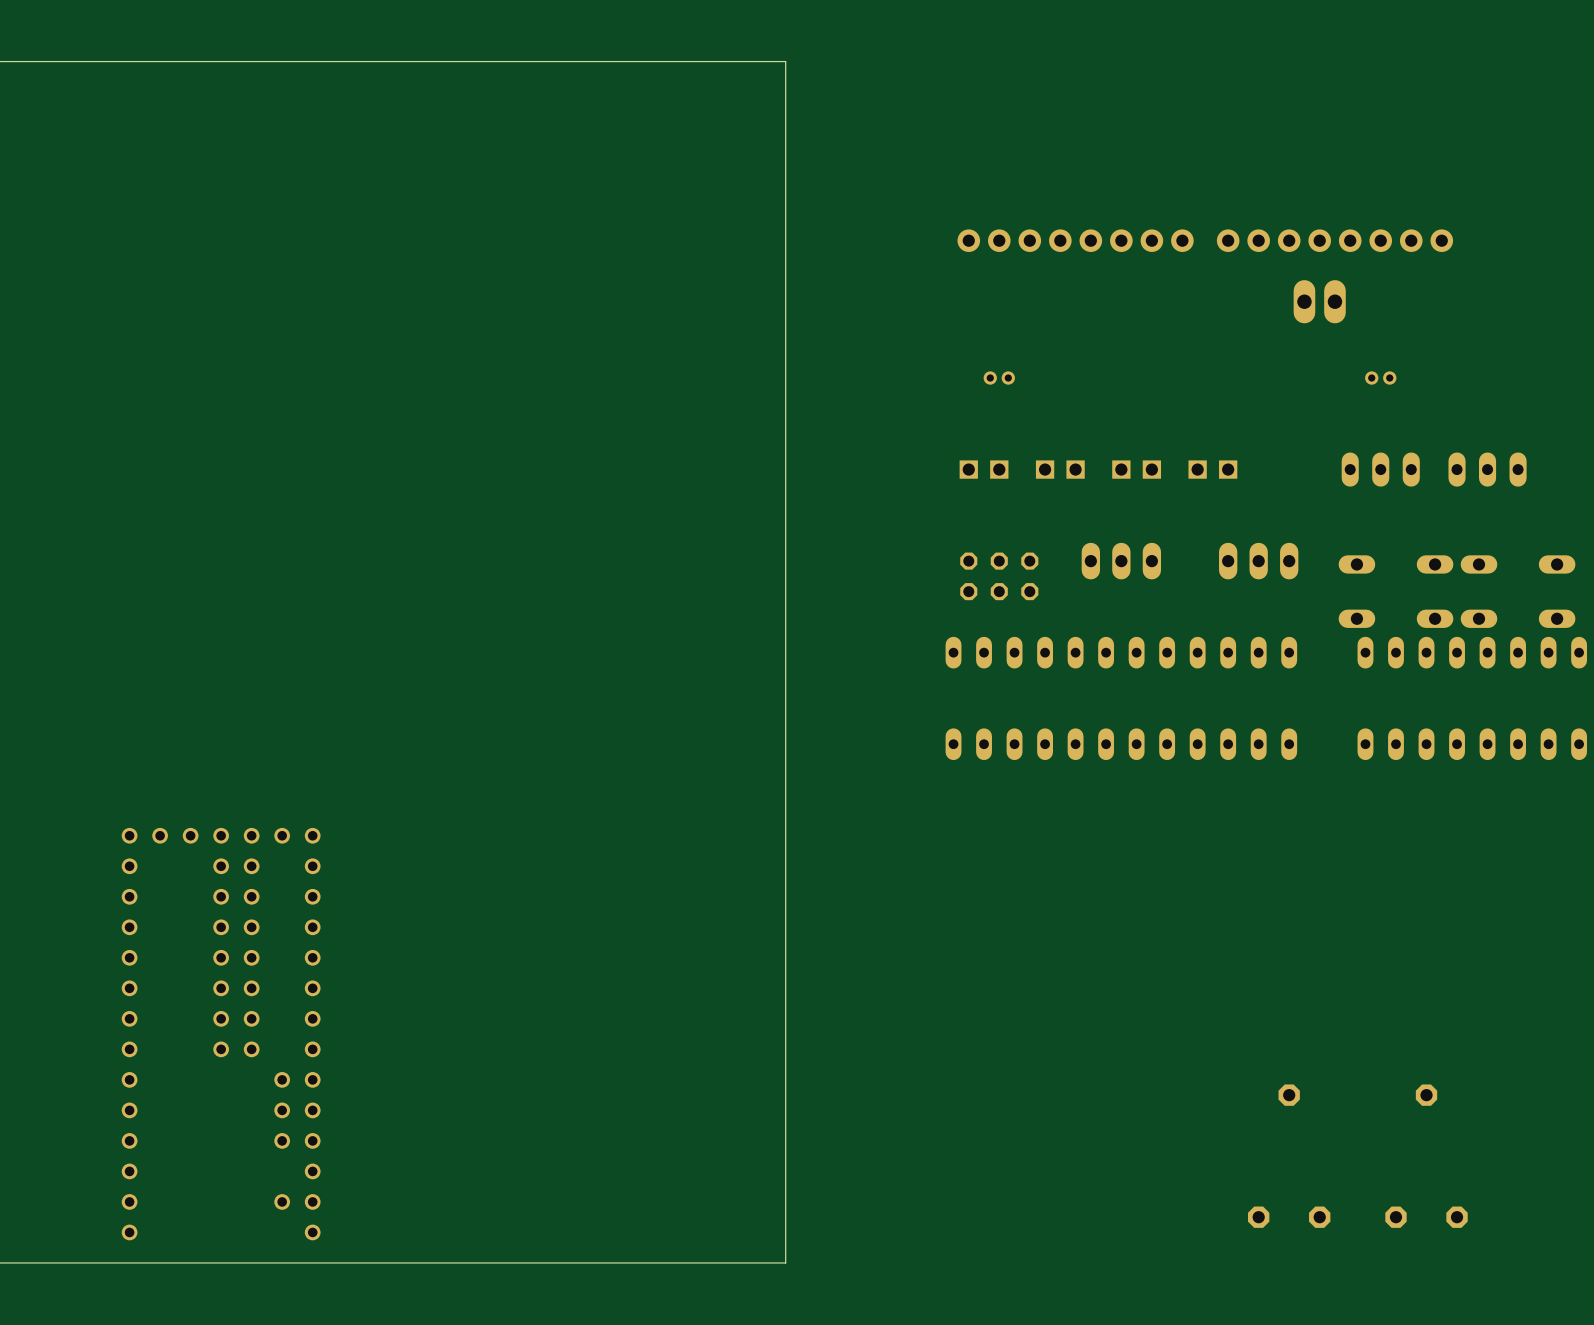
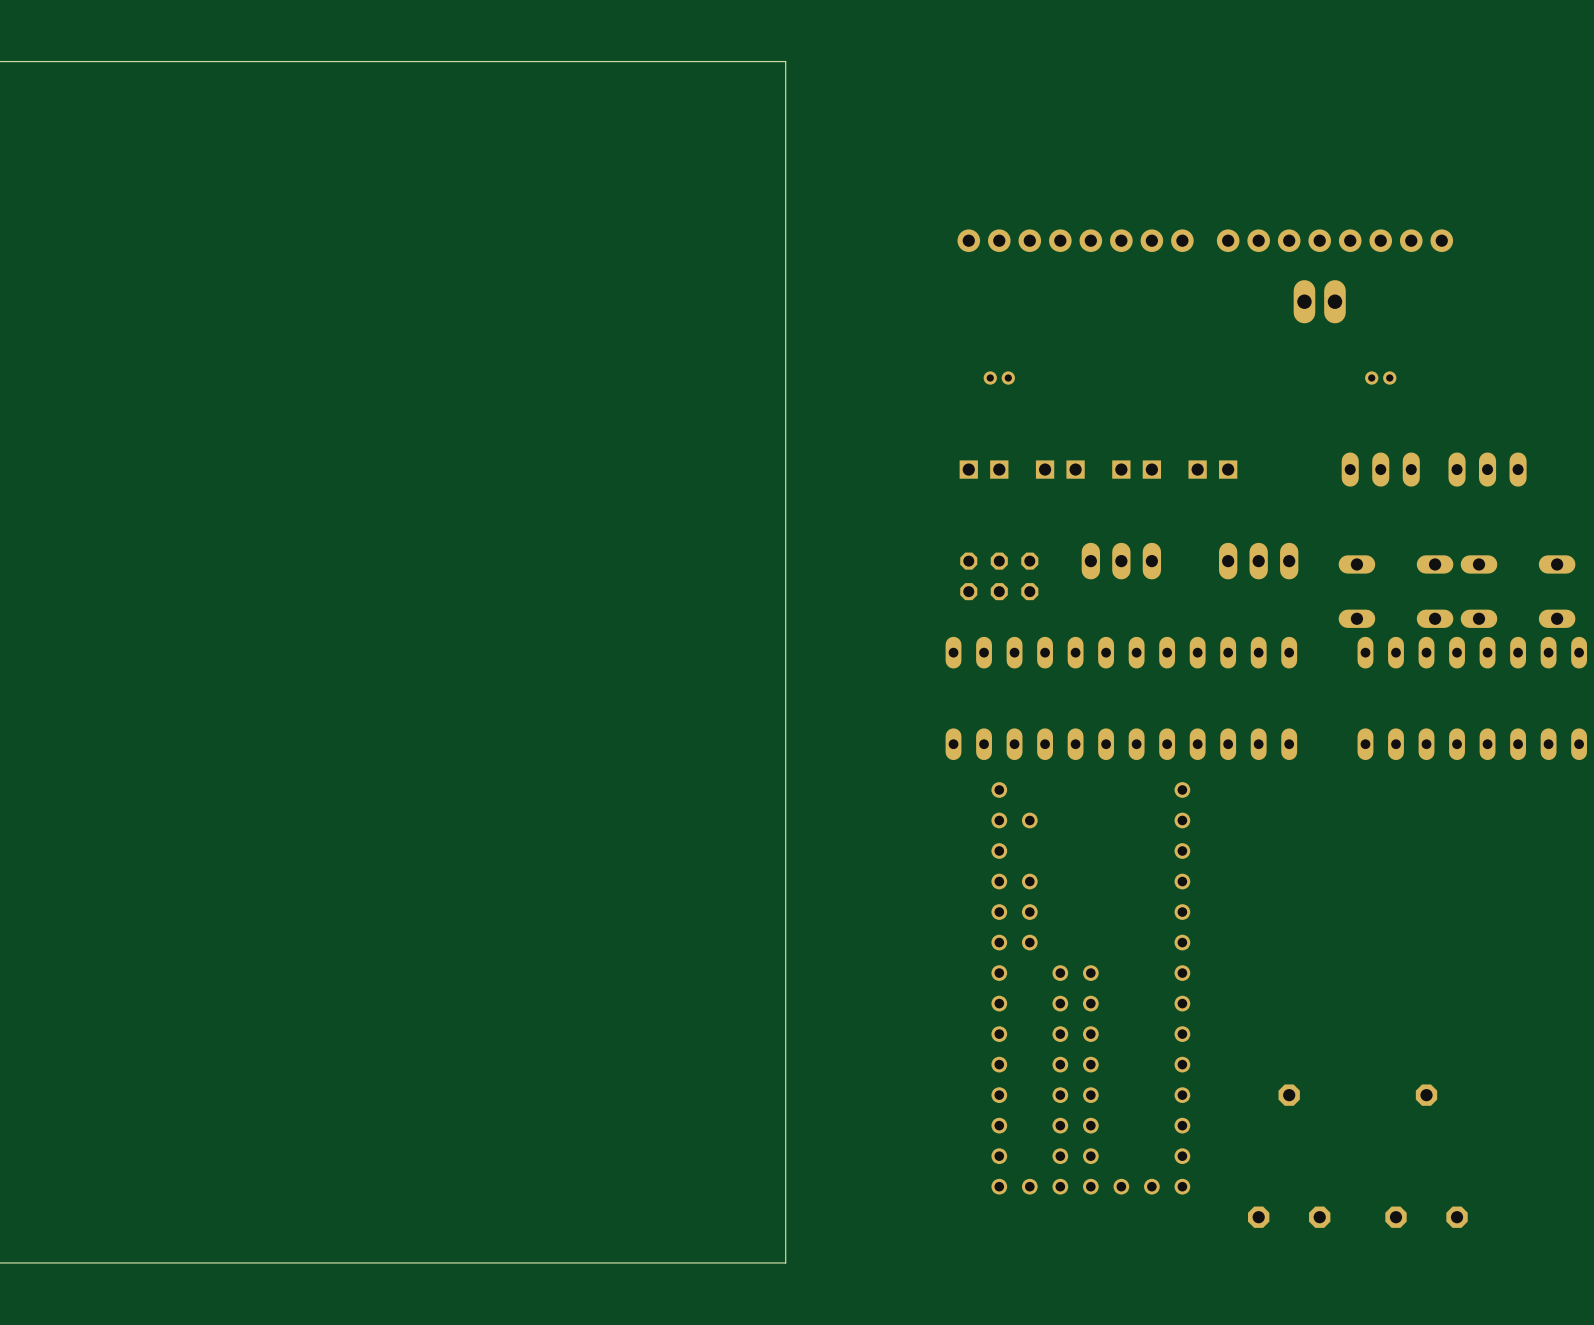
part: none -> (1090, 988)
part: (221, 1034) -> none

